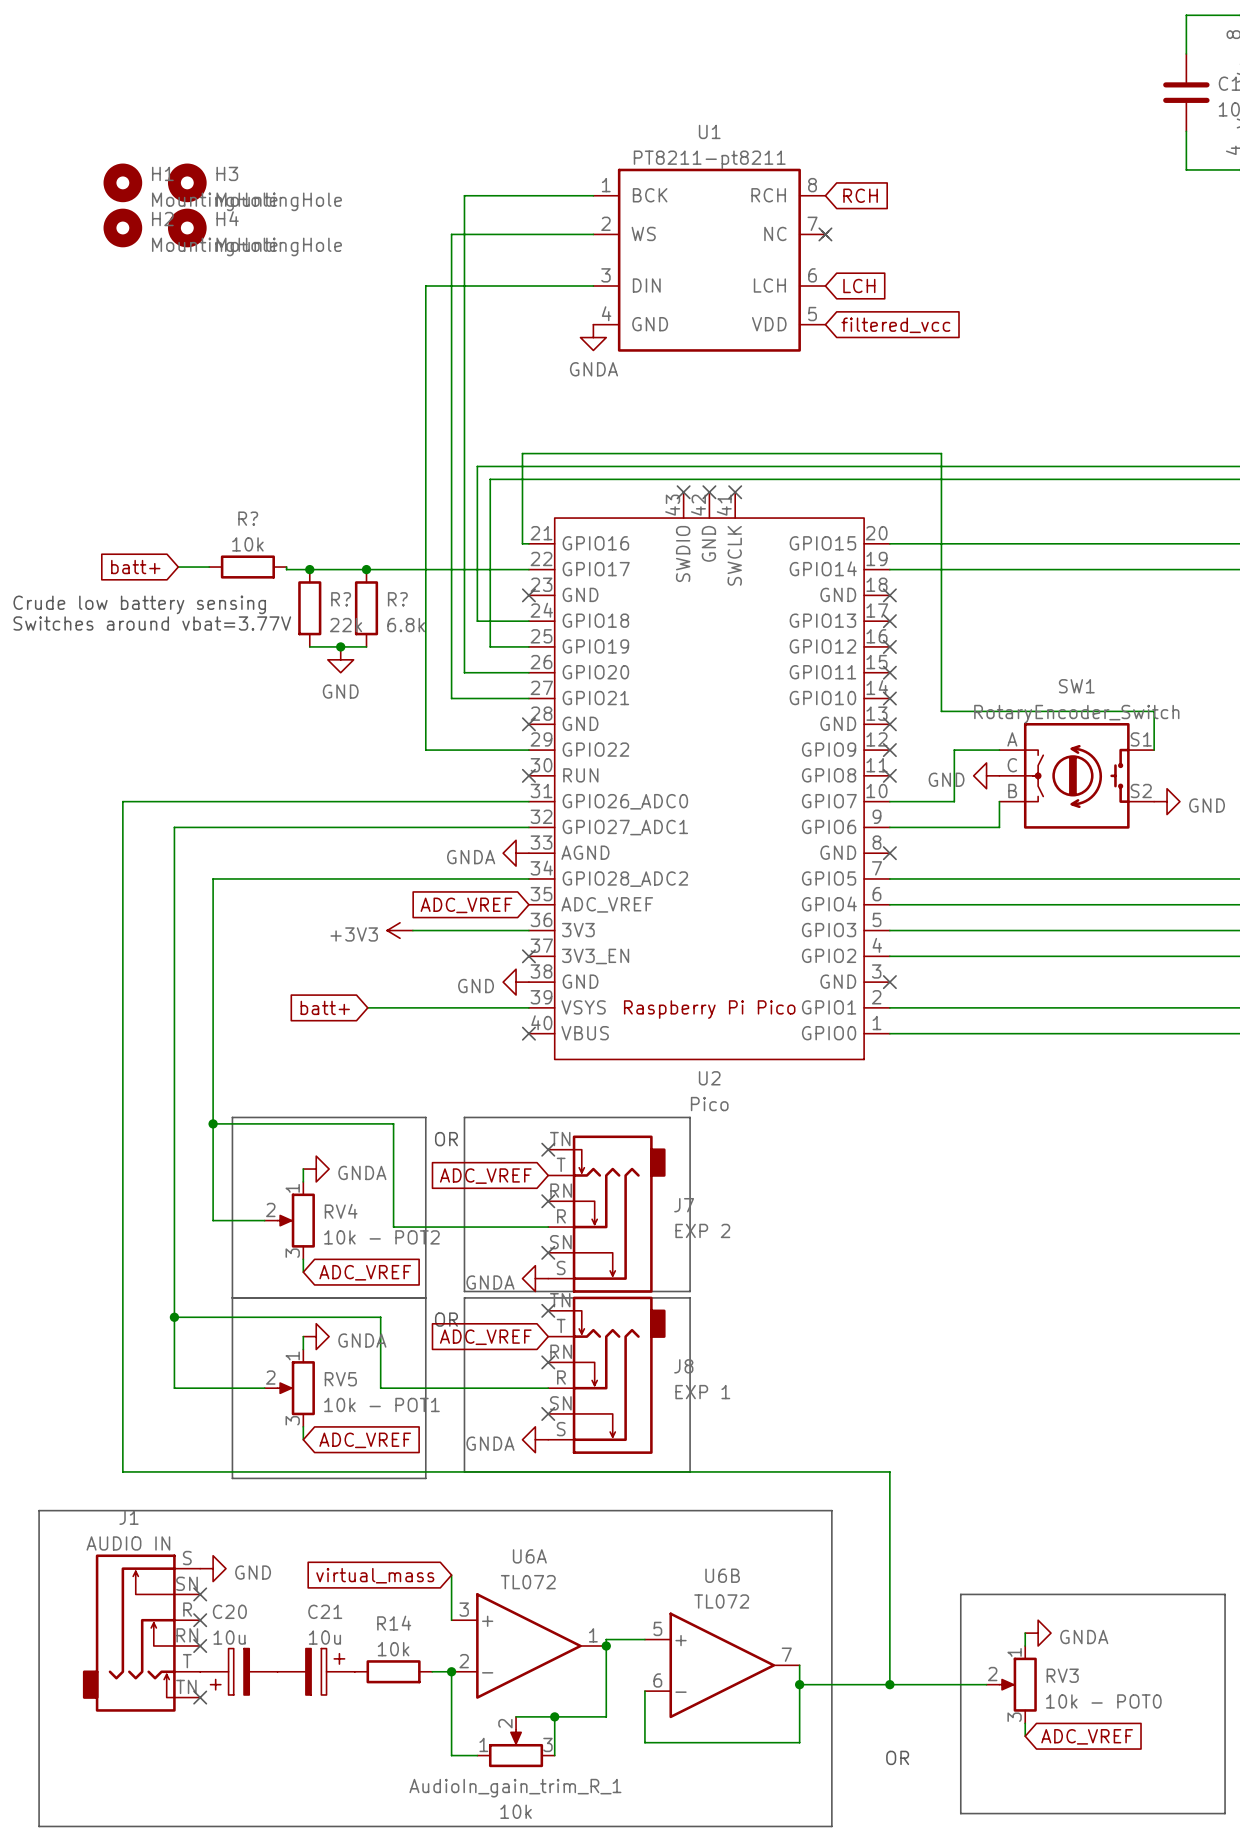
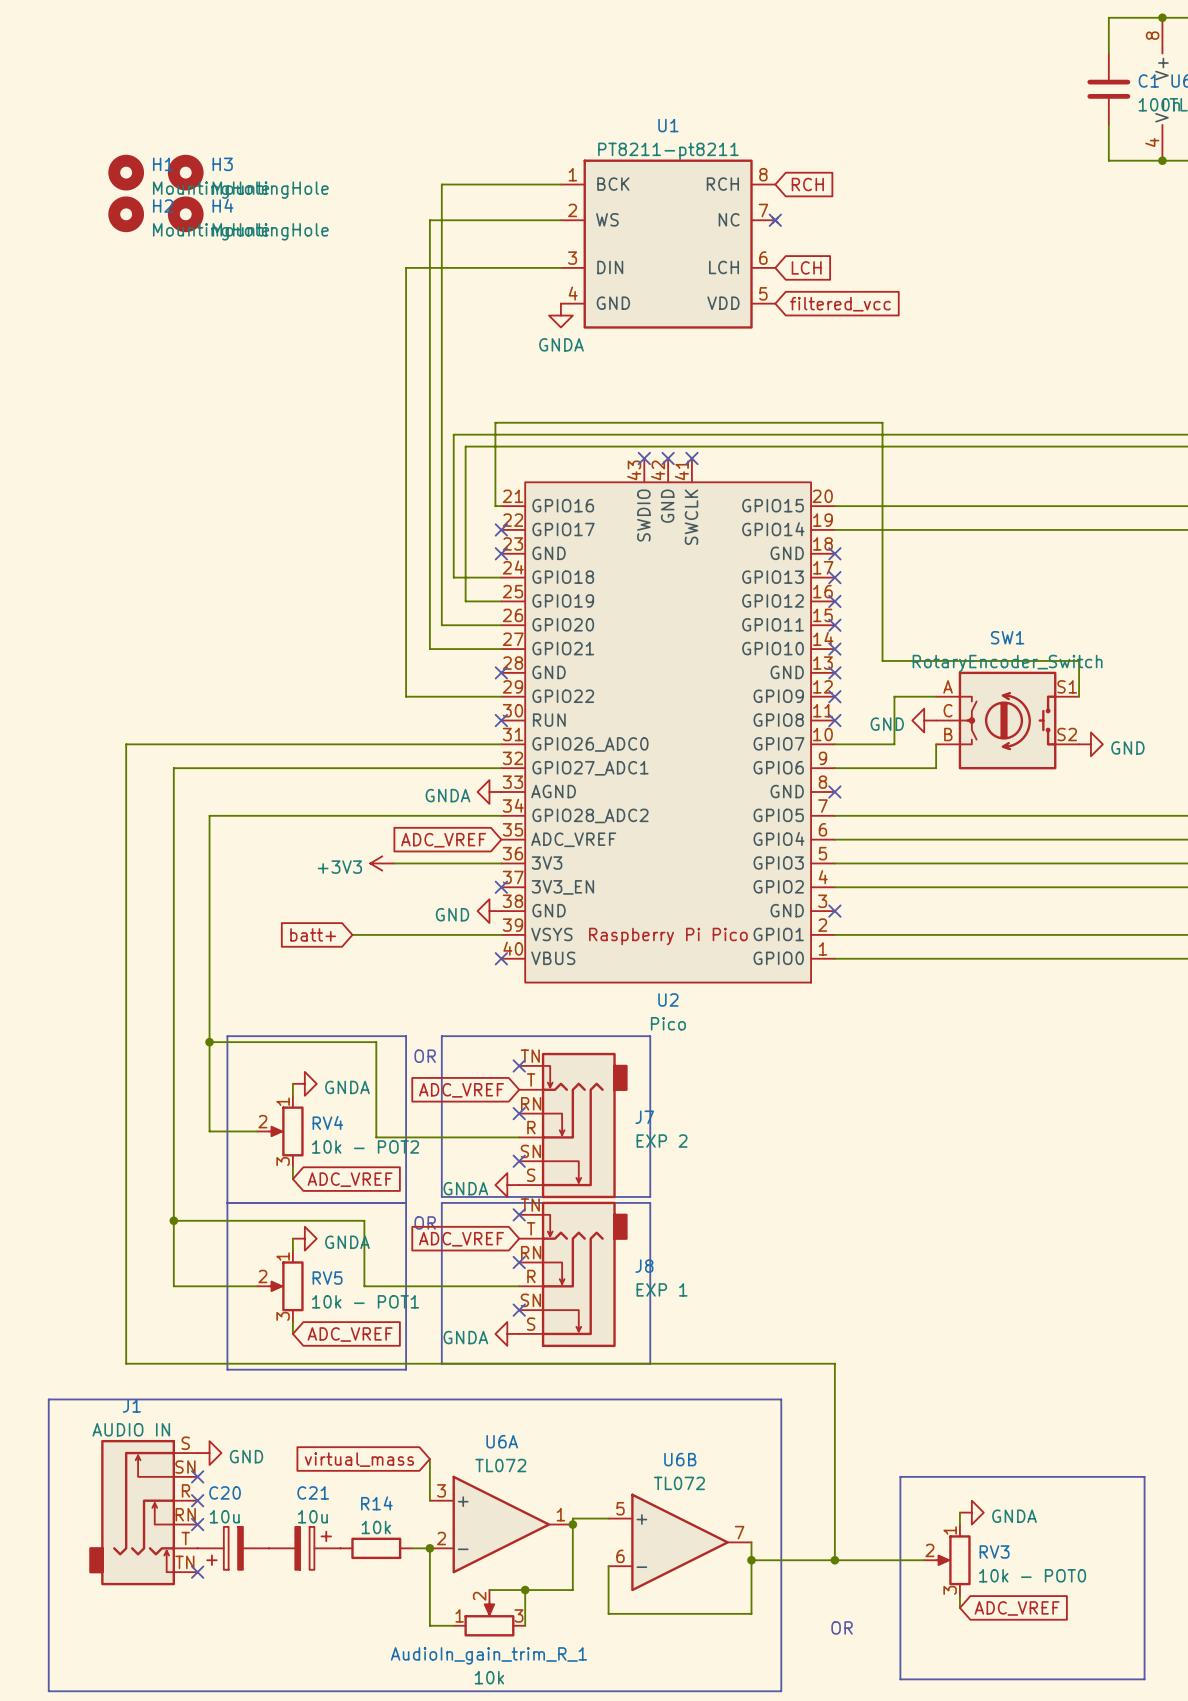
global label: batt+ (135, 567) -> none
wire: (178, 567) (209, 567) -> none
R?: 10k (247, 567) -> none
wire: (286, 567) (286, 569) (528, 569) -> none
junction: (309, 569) -> none
junction: (366, 569) -> none
no-connect mark: none -> (501, 529)
text: Crude low battery sensing (139, 604) -> none
R?: 22k (309, 608) -> none
R?: 6.8k (366, 608) -> none
text: Switches around vbat=3.77V (152, 623) -> none
wire: (309, 646) (366, 646) -> none
junction: (340, 646) -> none
power symbol: GND (340, 659) -> none

